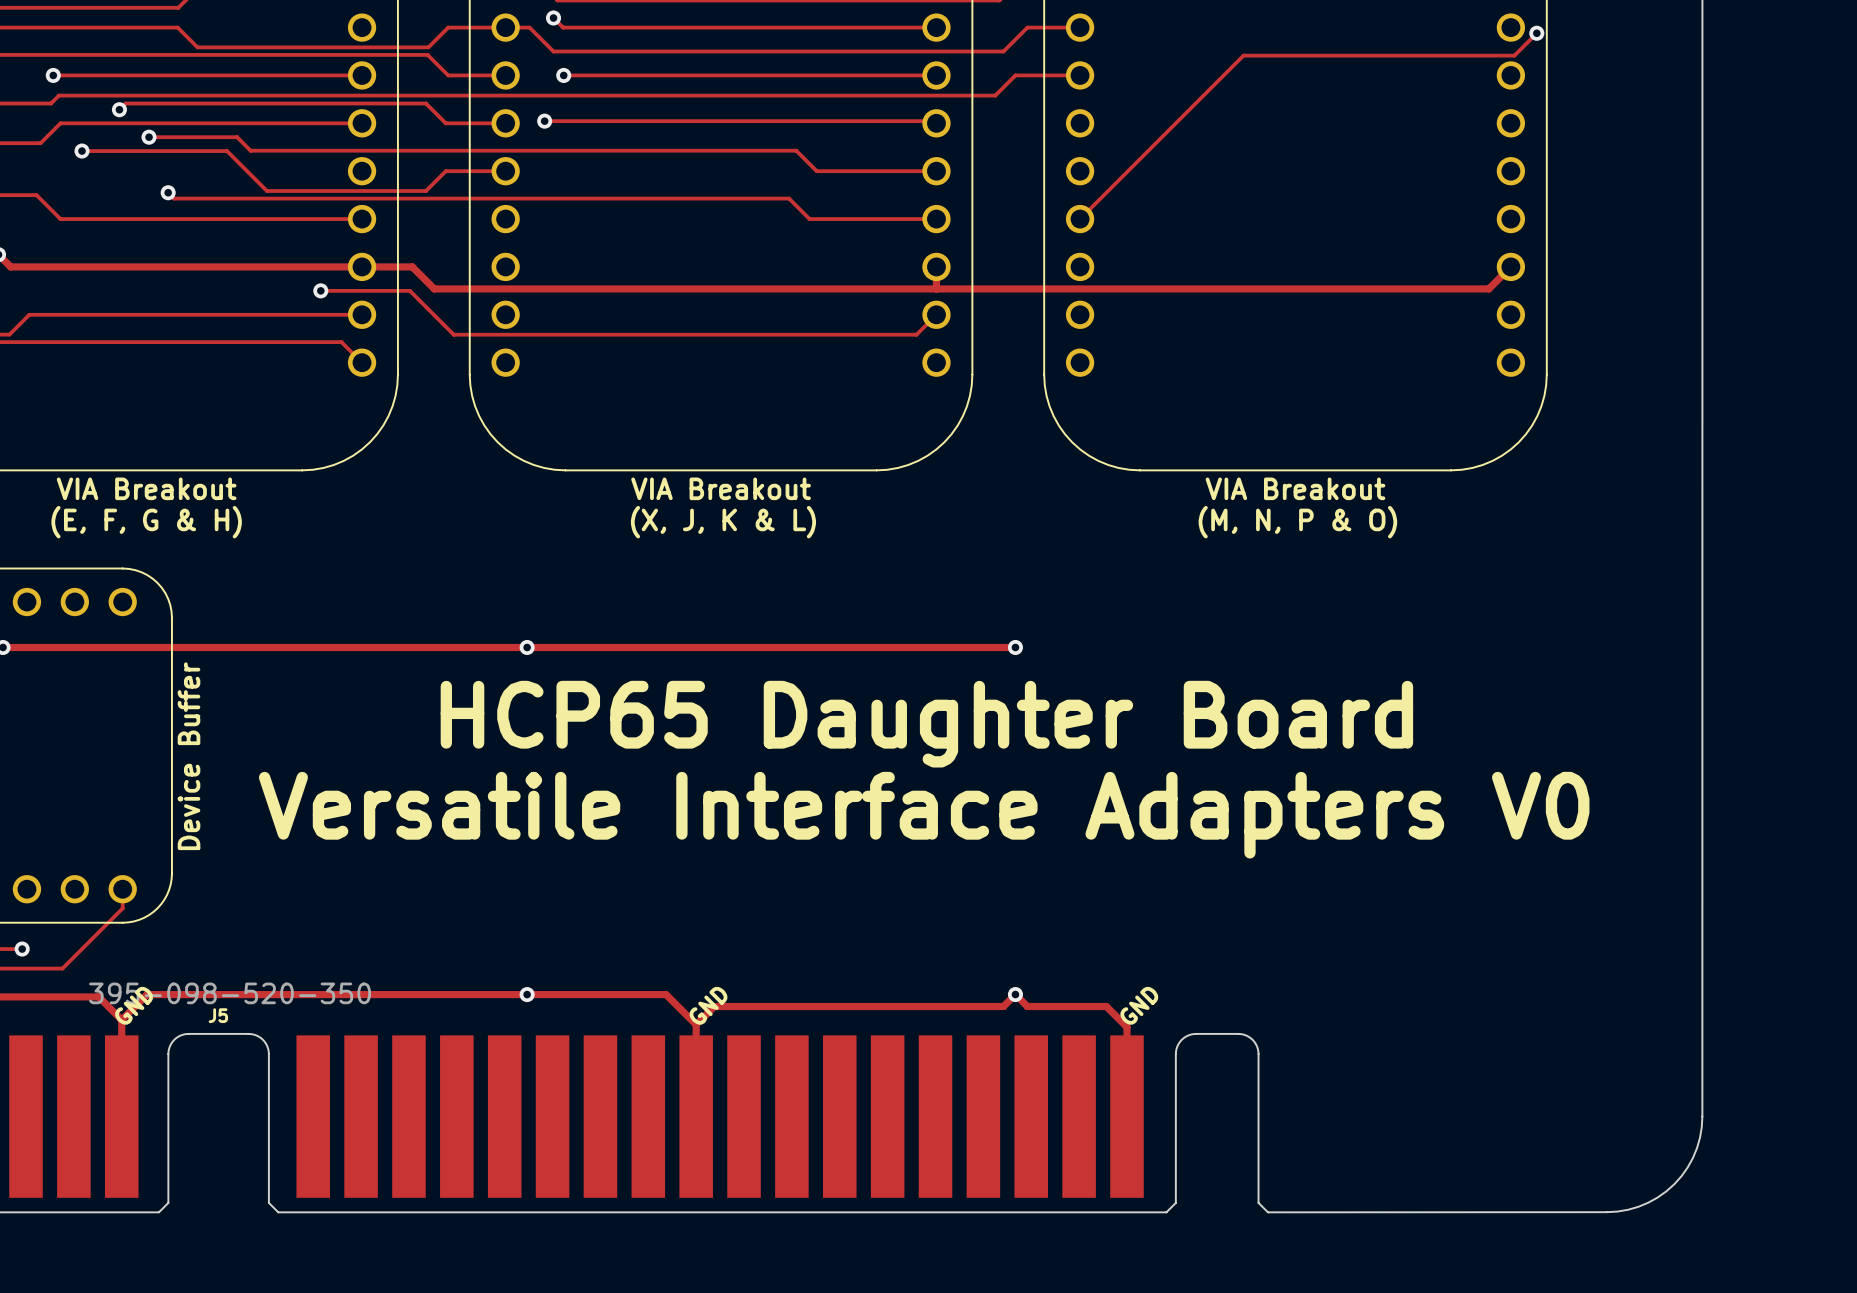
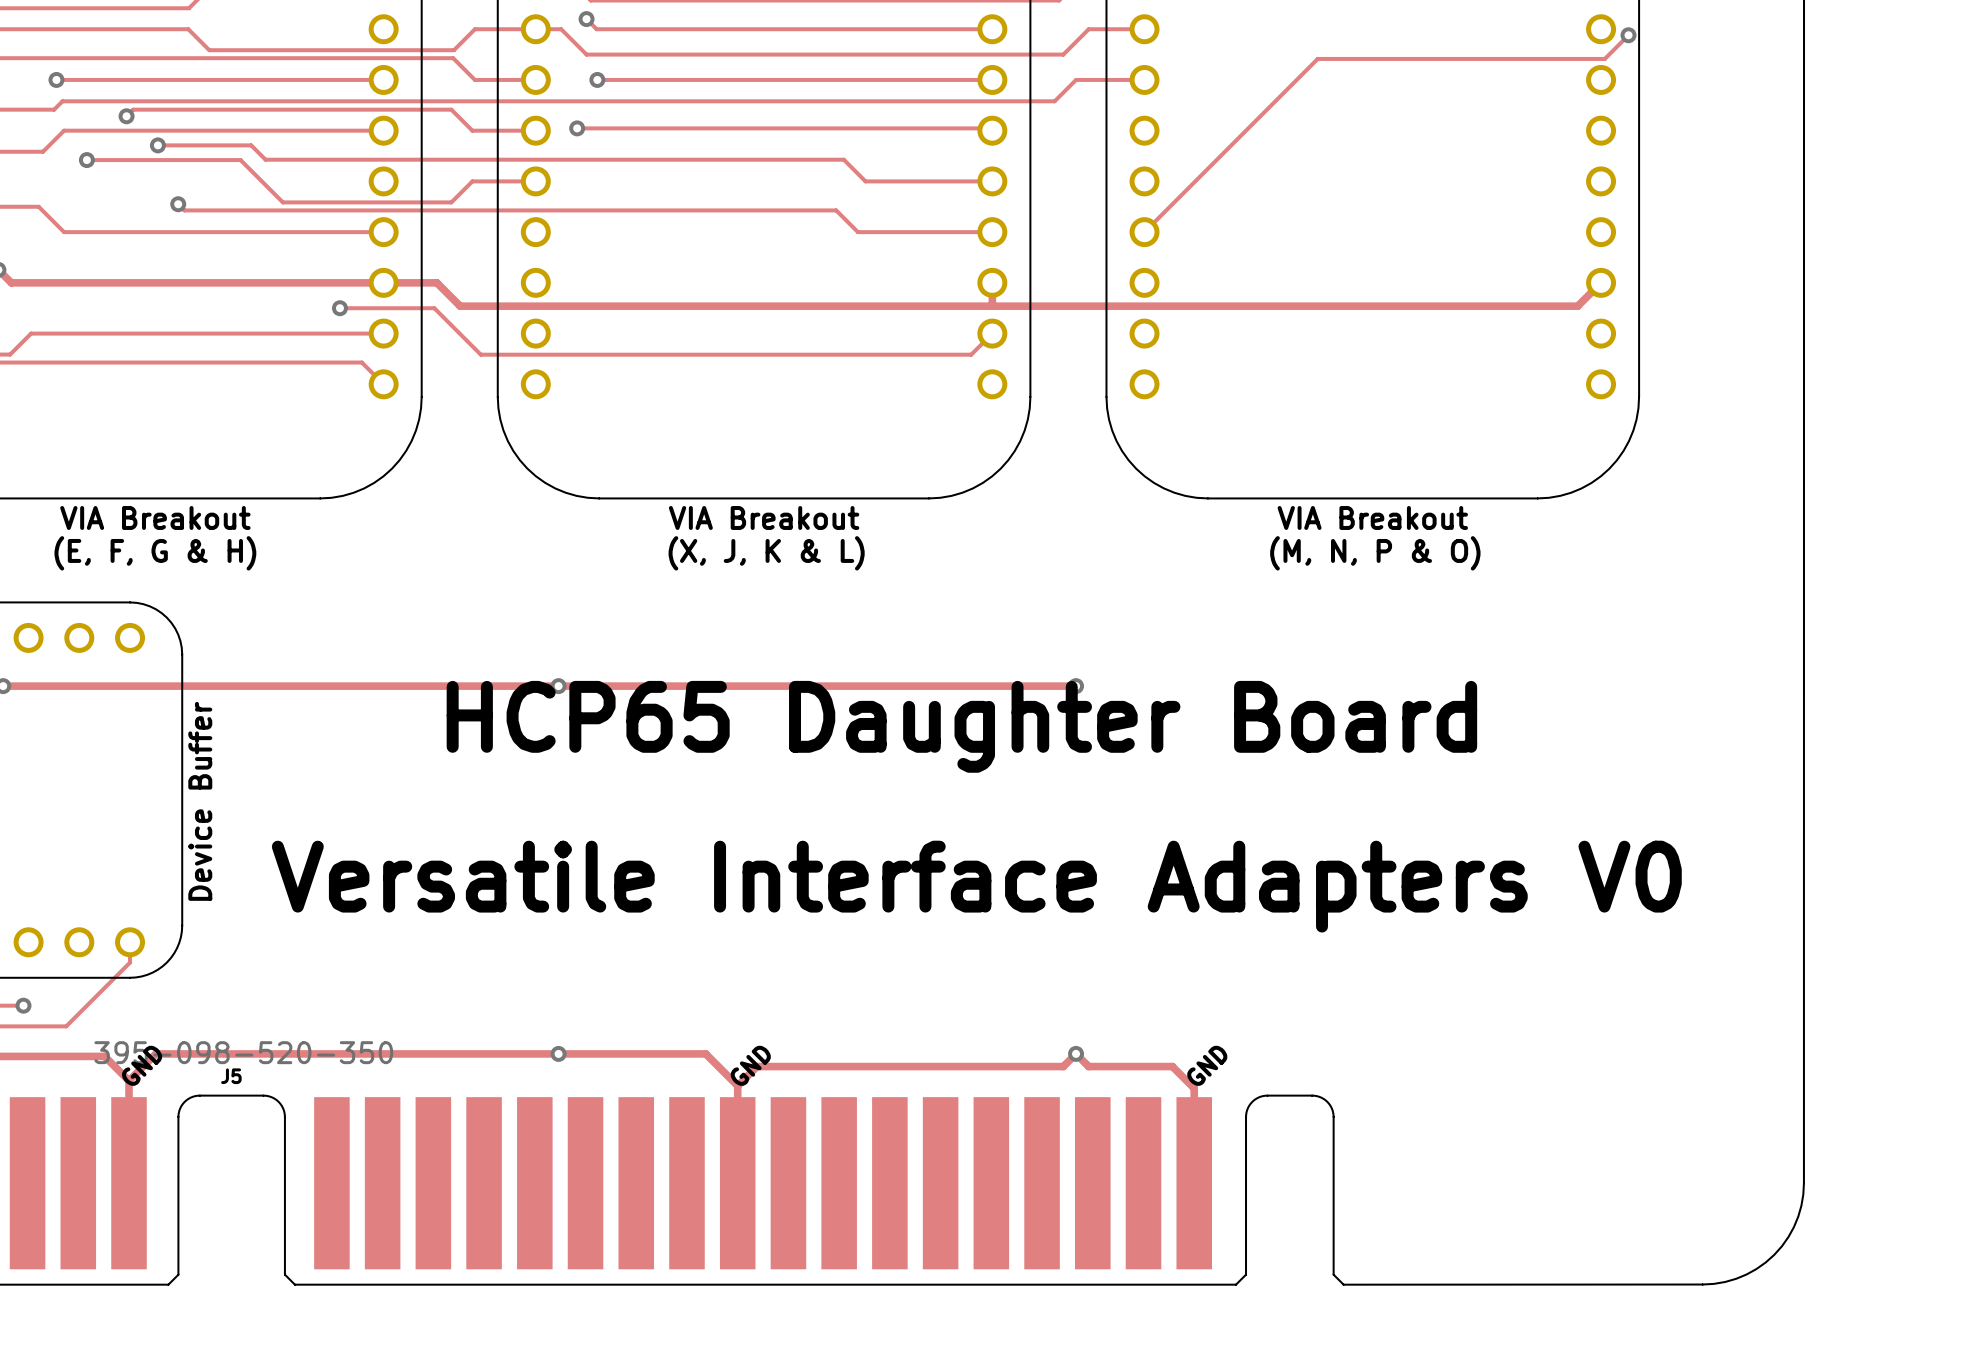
text position: HCP65 Daughter Board (926, 724) -> HCP65 Daughter Board (961, 726)
text position: Versatile Interface Adapters V0 (924, 815) -> Versatile Interface Adapters V0 (976, 886)

